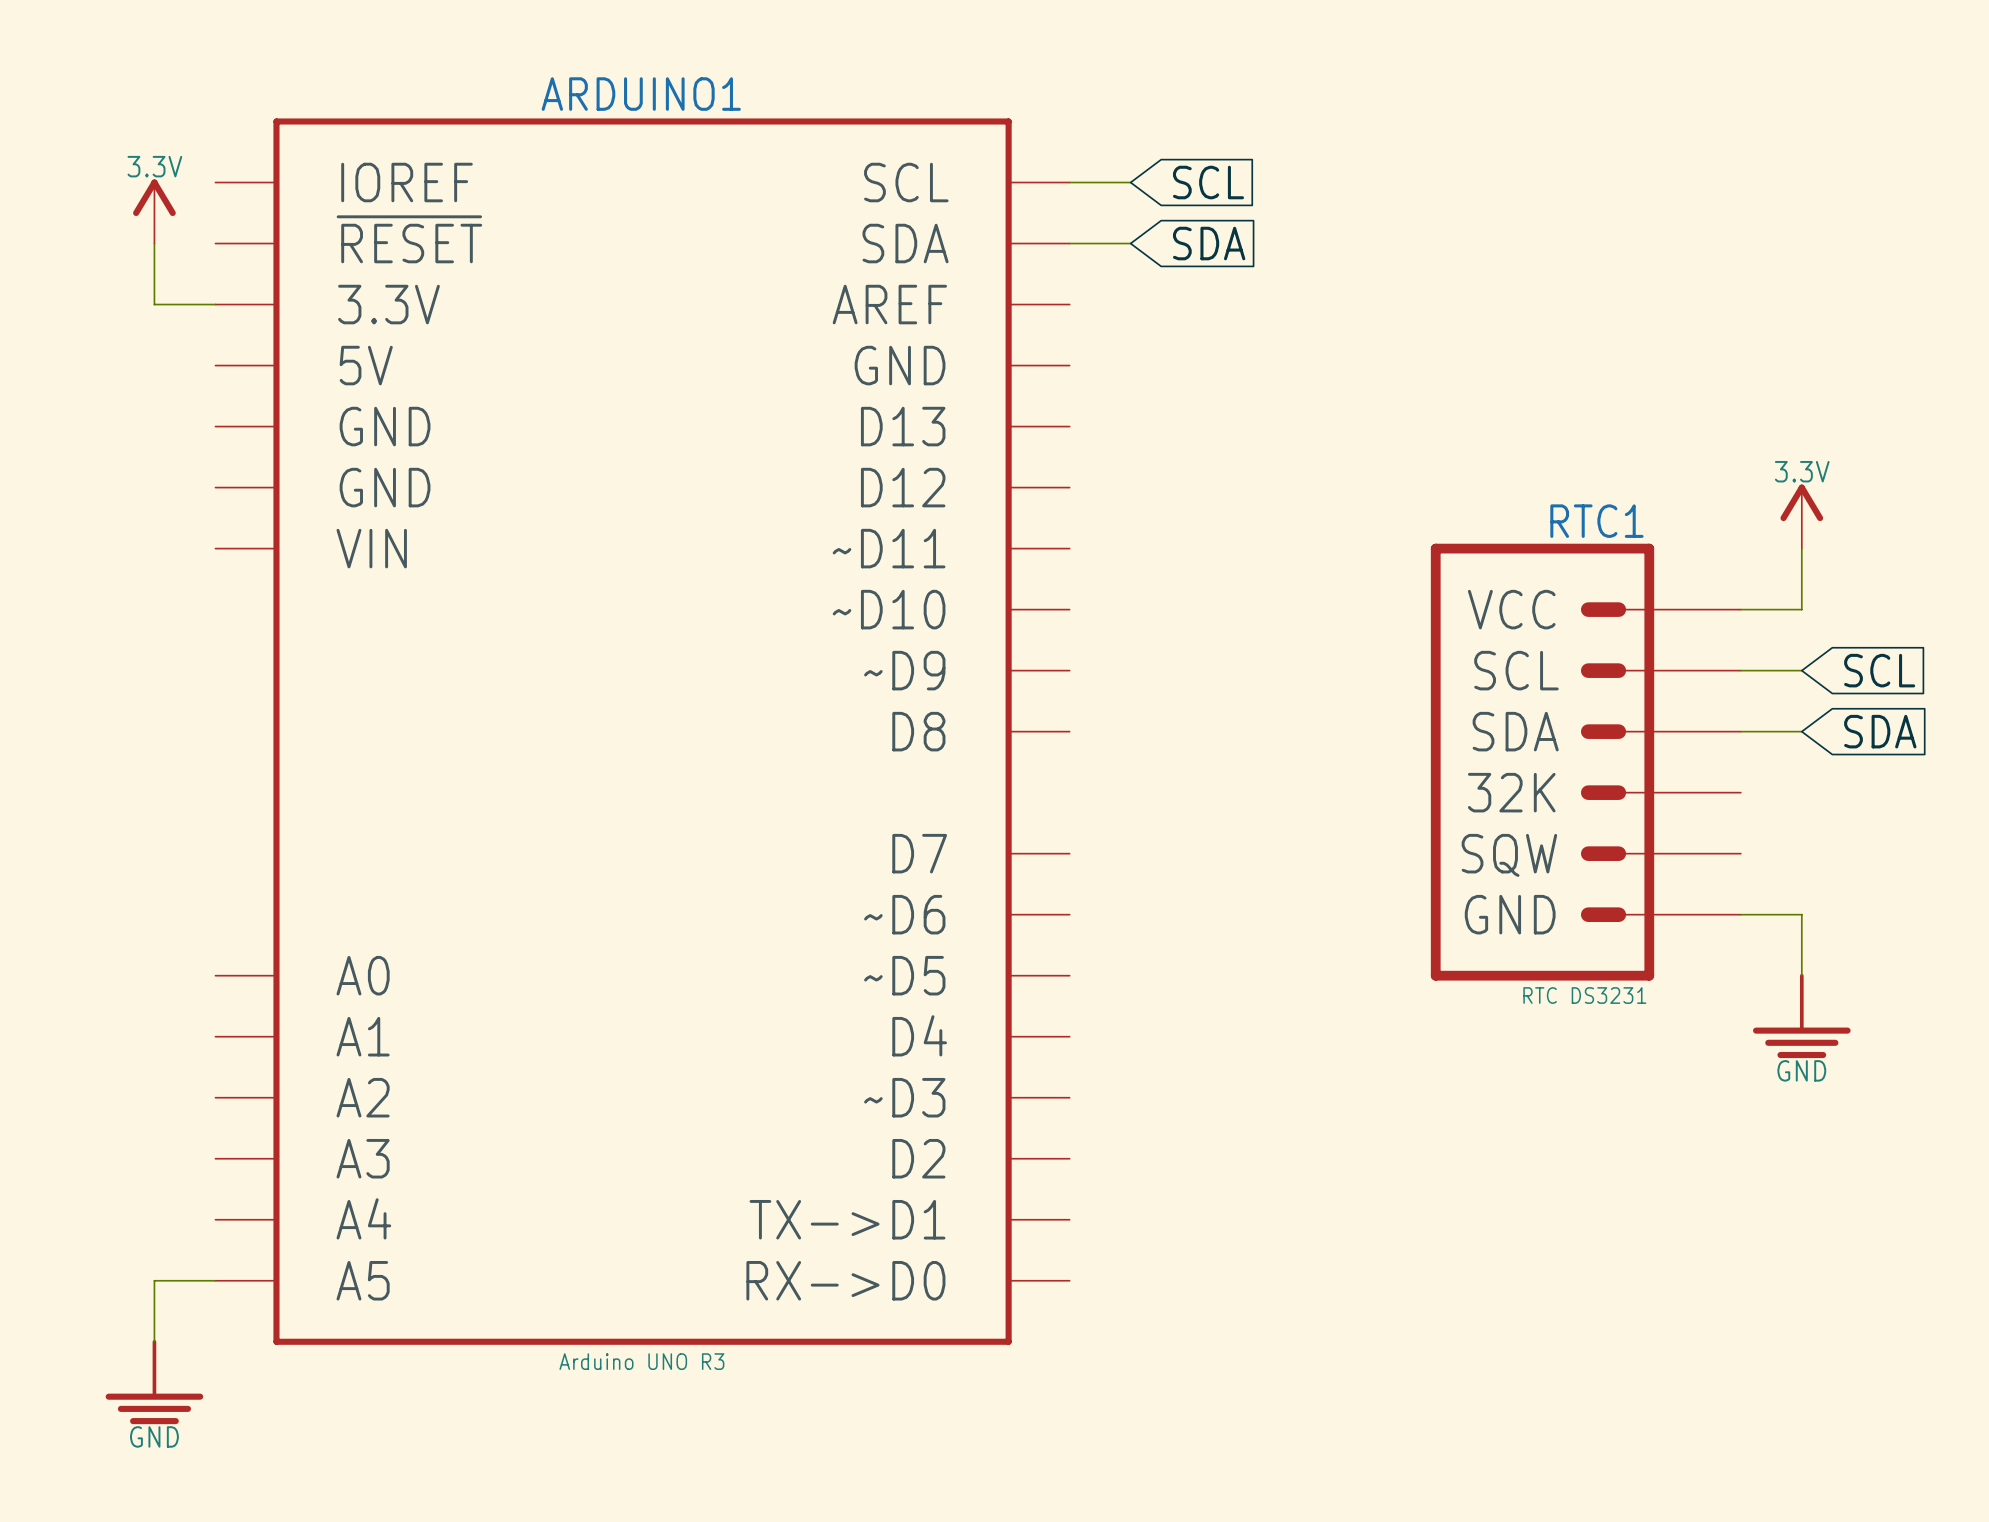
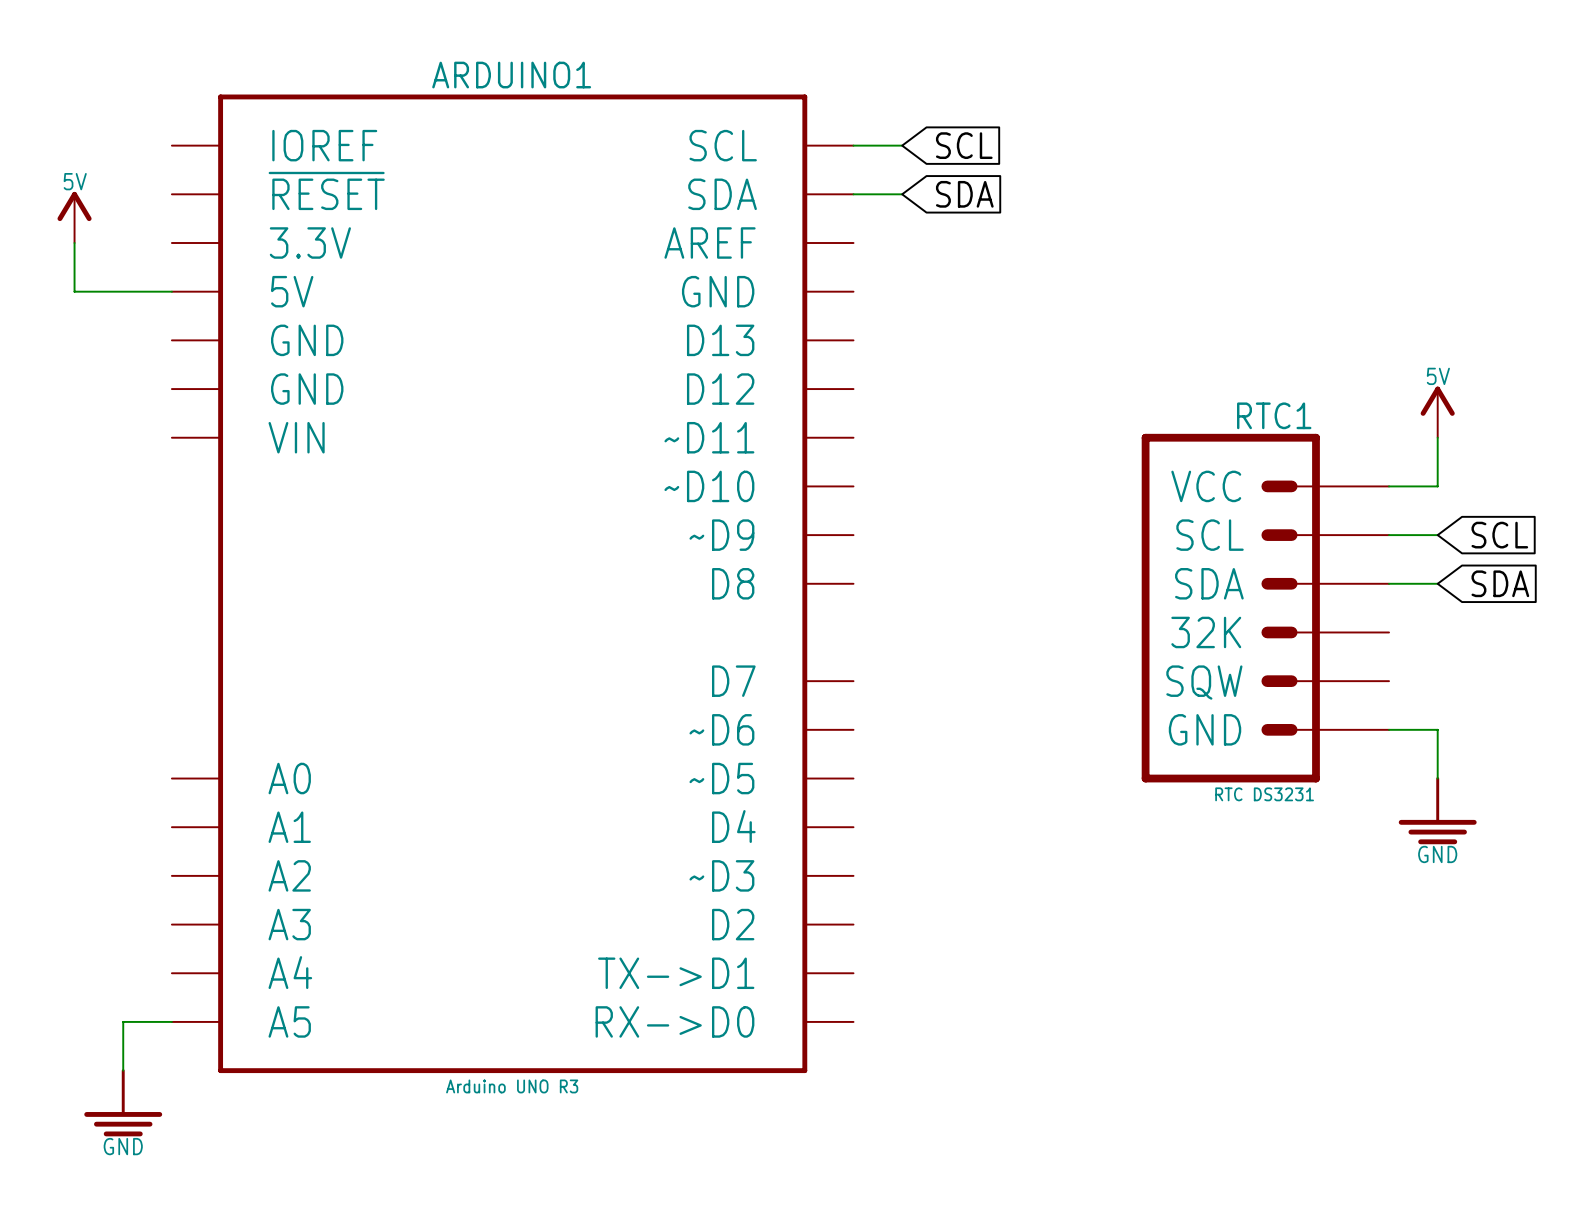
power symbol: (154, 211) -> none
wire: (154, 243) (154, 304) (215, 304) -> none
power symbol: none -> (74, 217)
wire: none -> (74, 243) (74, 291) (171, 291)
power symbol text: 3.3V (1802, 471) -> 5V (1438, 376)

